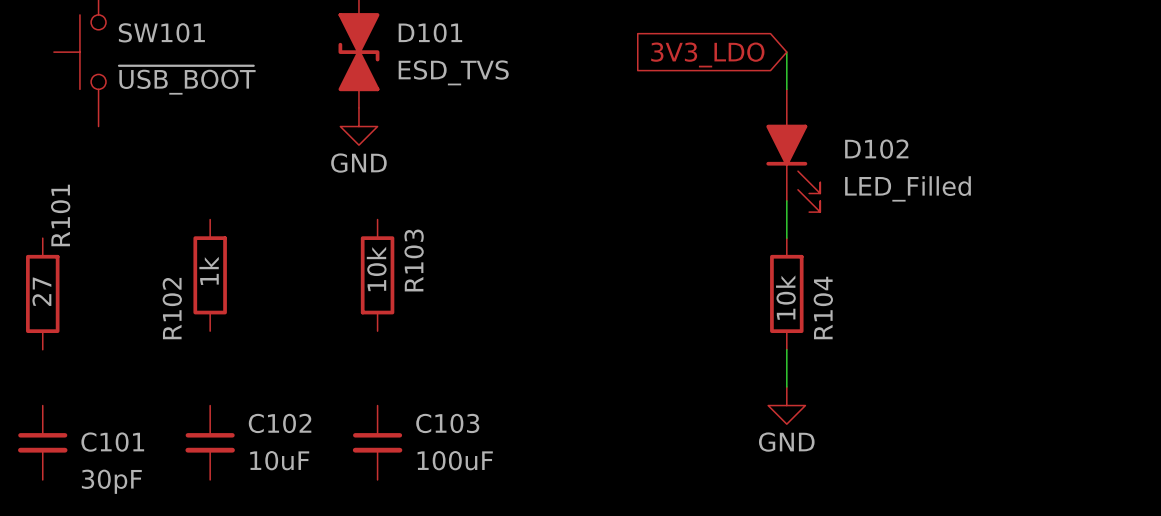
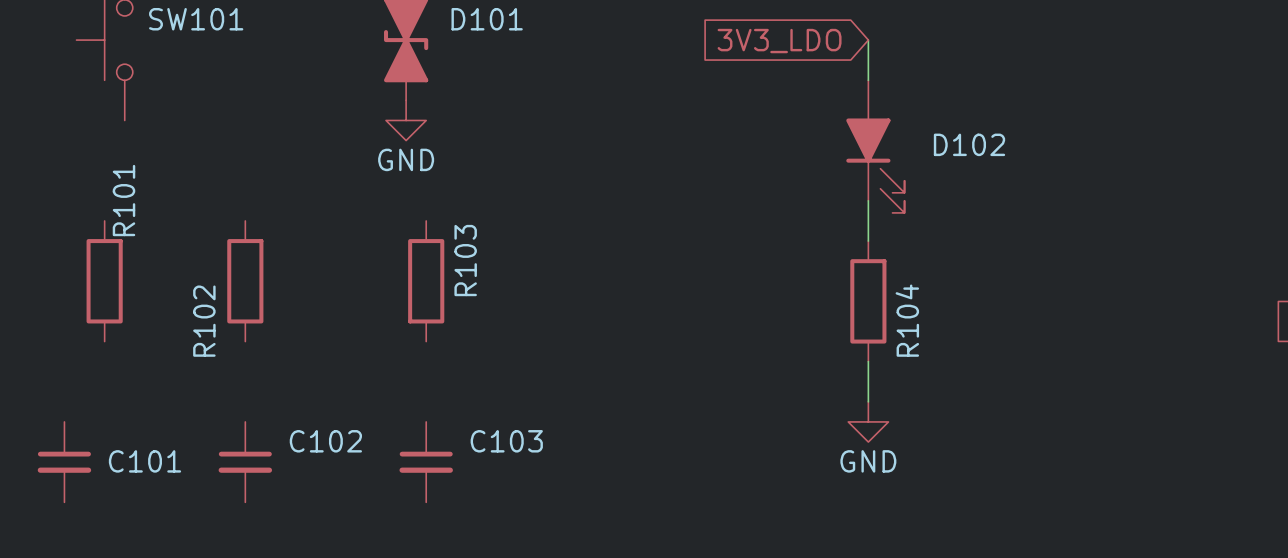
D101 value: ESD_TVS (453, 72) -> none
SW101 value: ~{USB_BOOT} (187, 80) -> none
D102 value: LED_Filled (907, 188) -> none
R103 value: 10k (376, 268) -> none
R102 value: 1k (209, 270) -> none
R101 value: 27 (41, 291) -> none
R101 position: (42, 293) -> (104, 281)
R104 value: 10k (785, 297) -> none
C102 value: 10uF (279, 460) -> none
C103 value: 100uF (455, 460) -> none
C101 value: 30pF (111, 481) -> none

